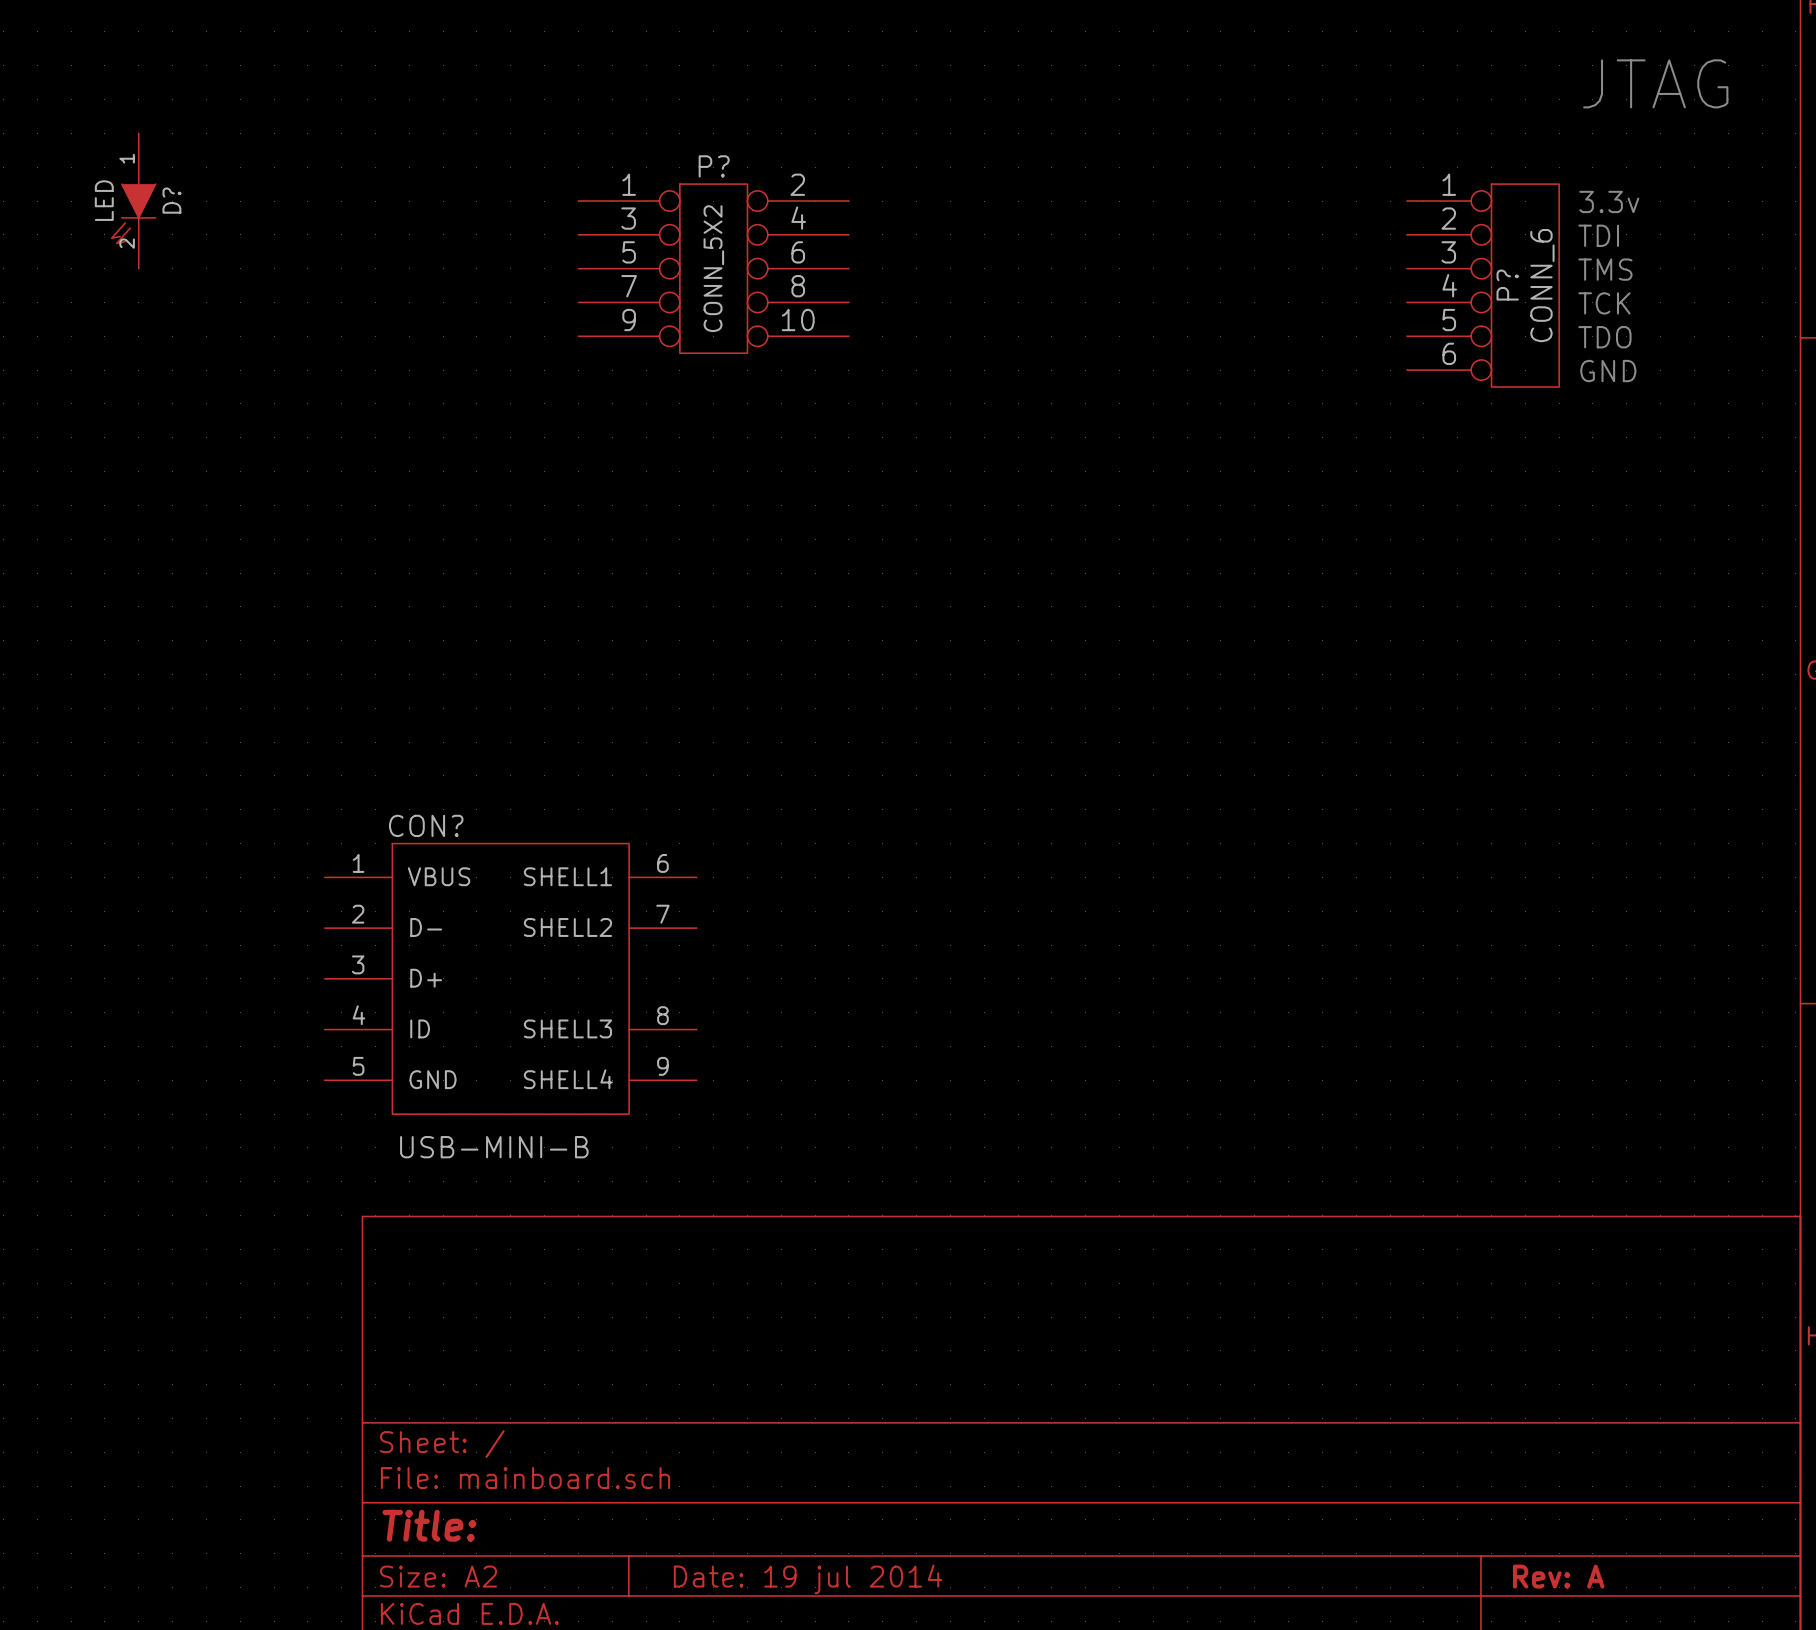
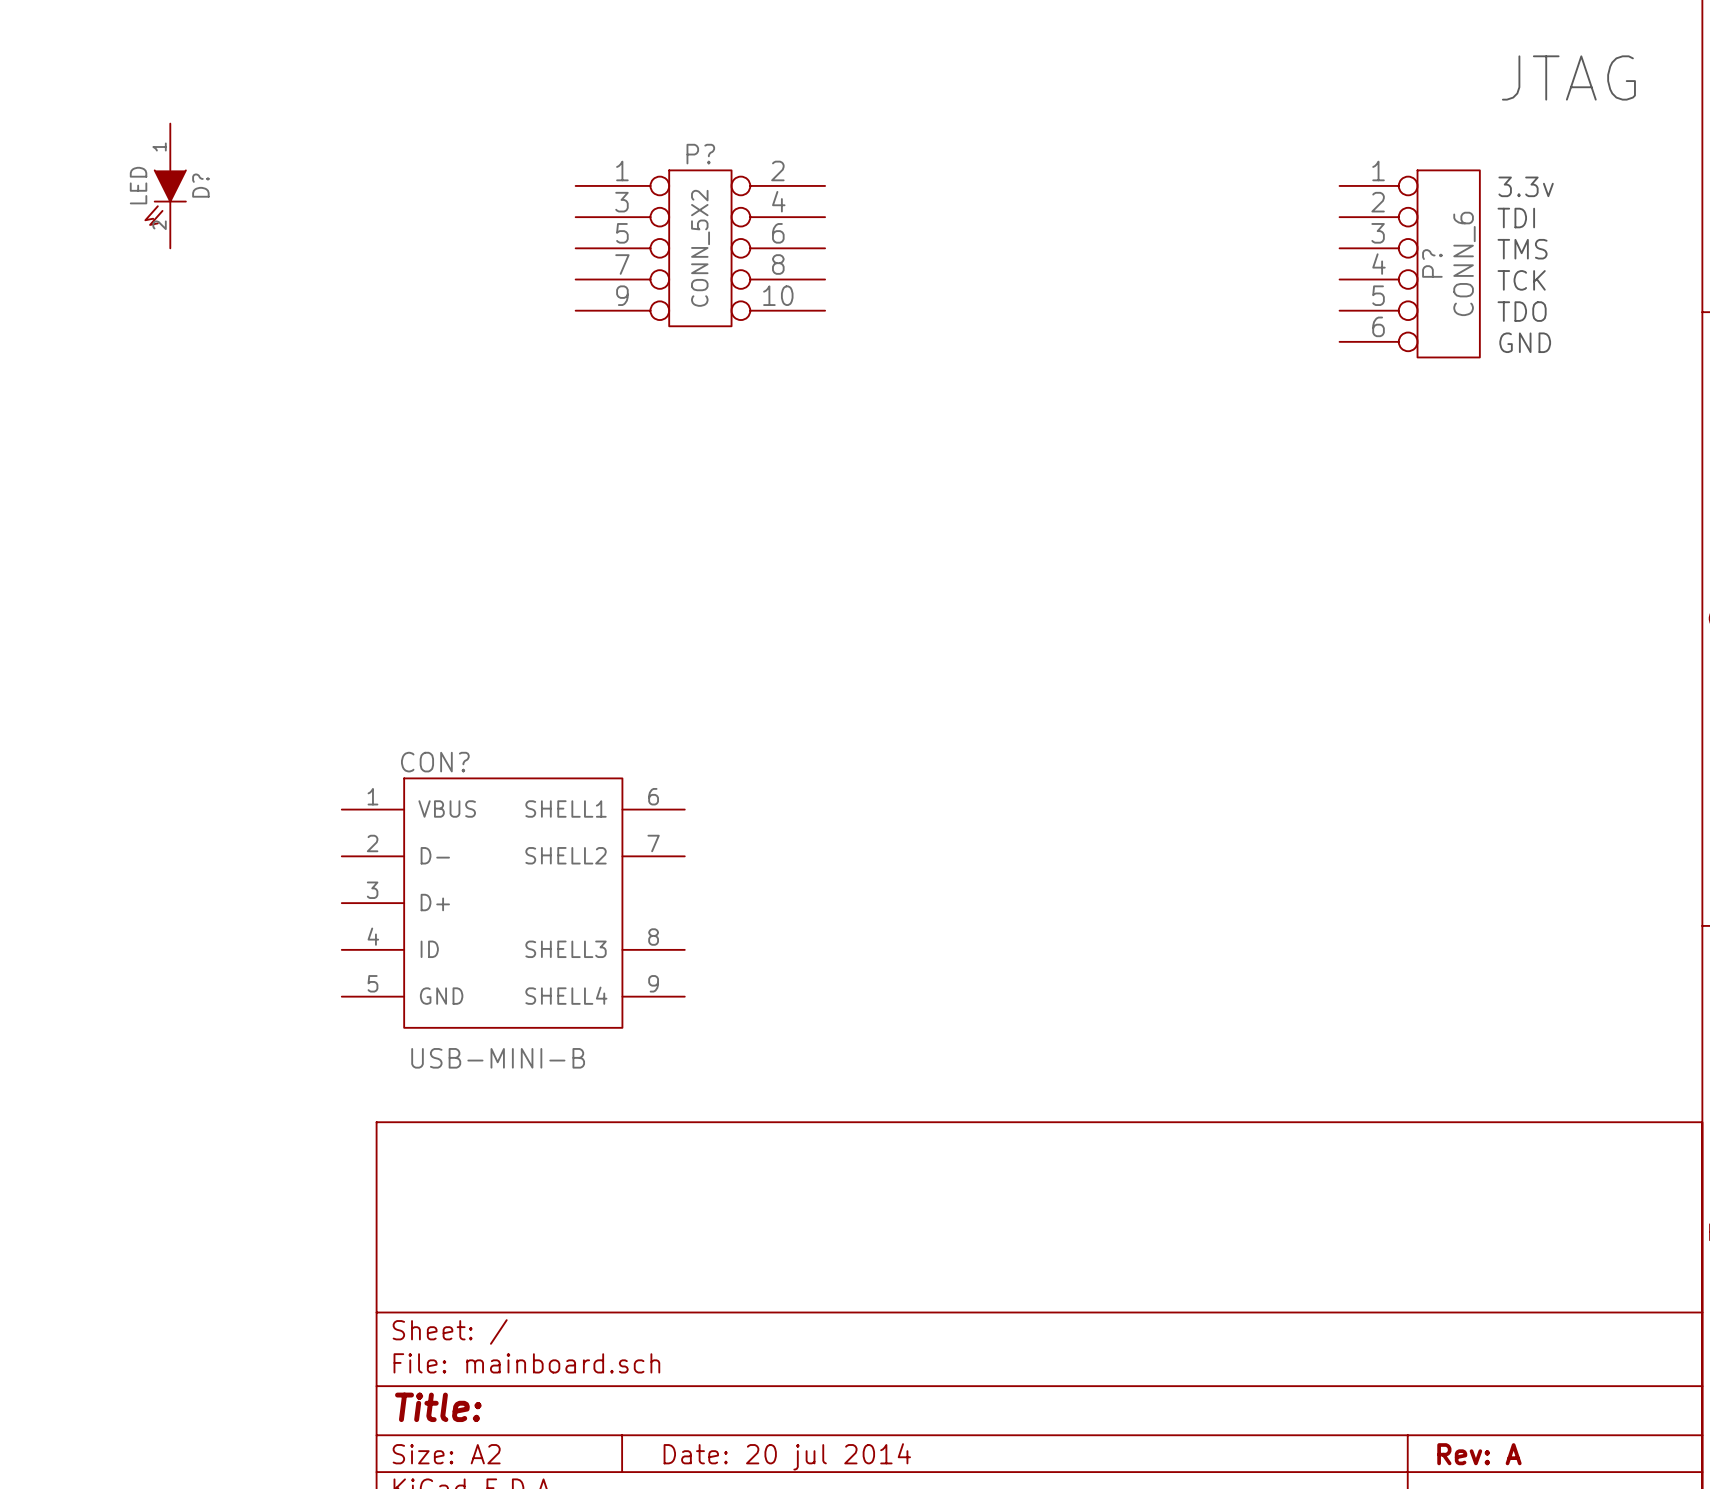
title block: Date: 19 jul 2014 (807, 1579) -> Date: 20 jul 2014 (787, 1456)

